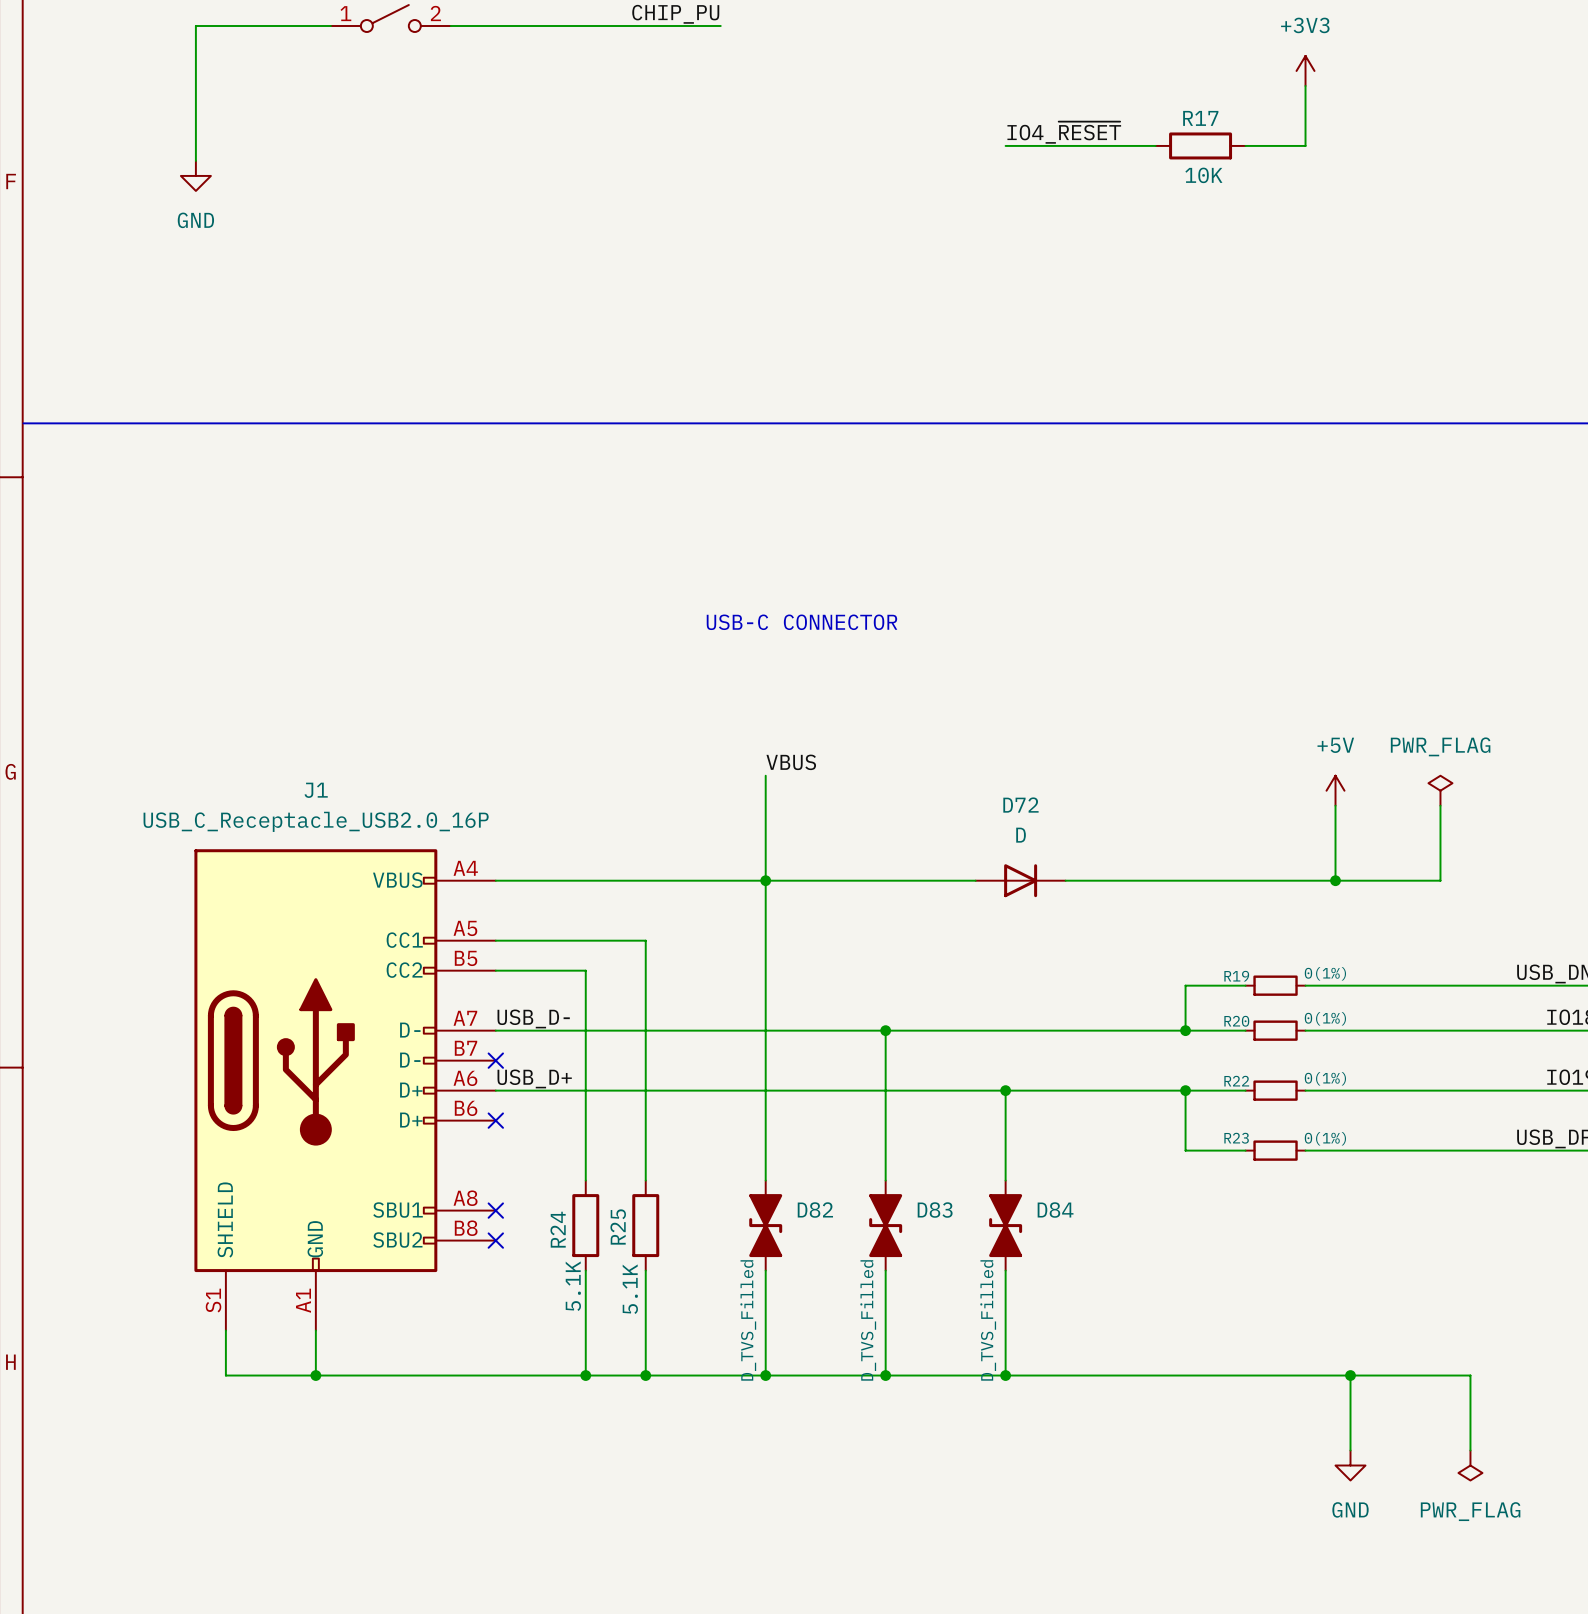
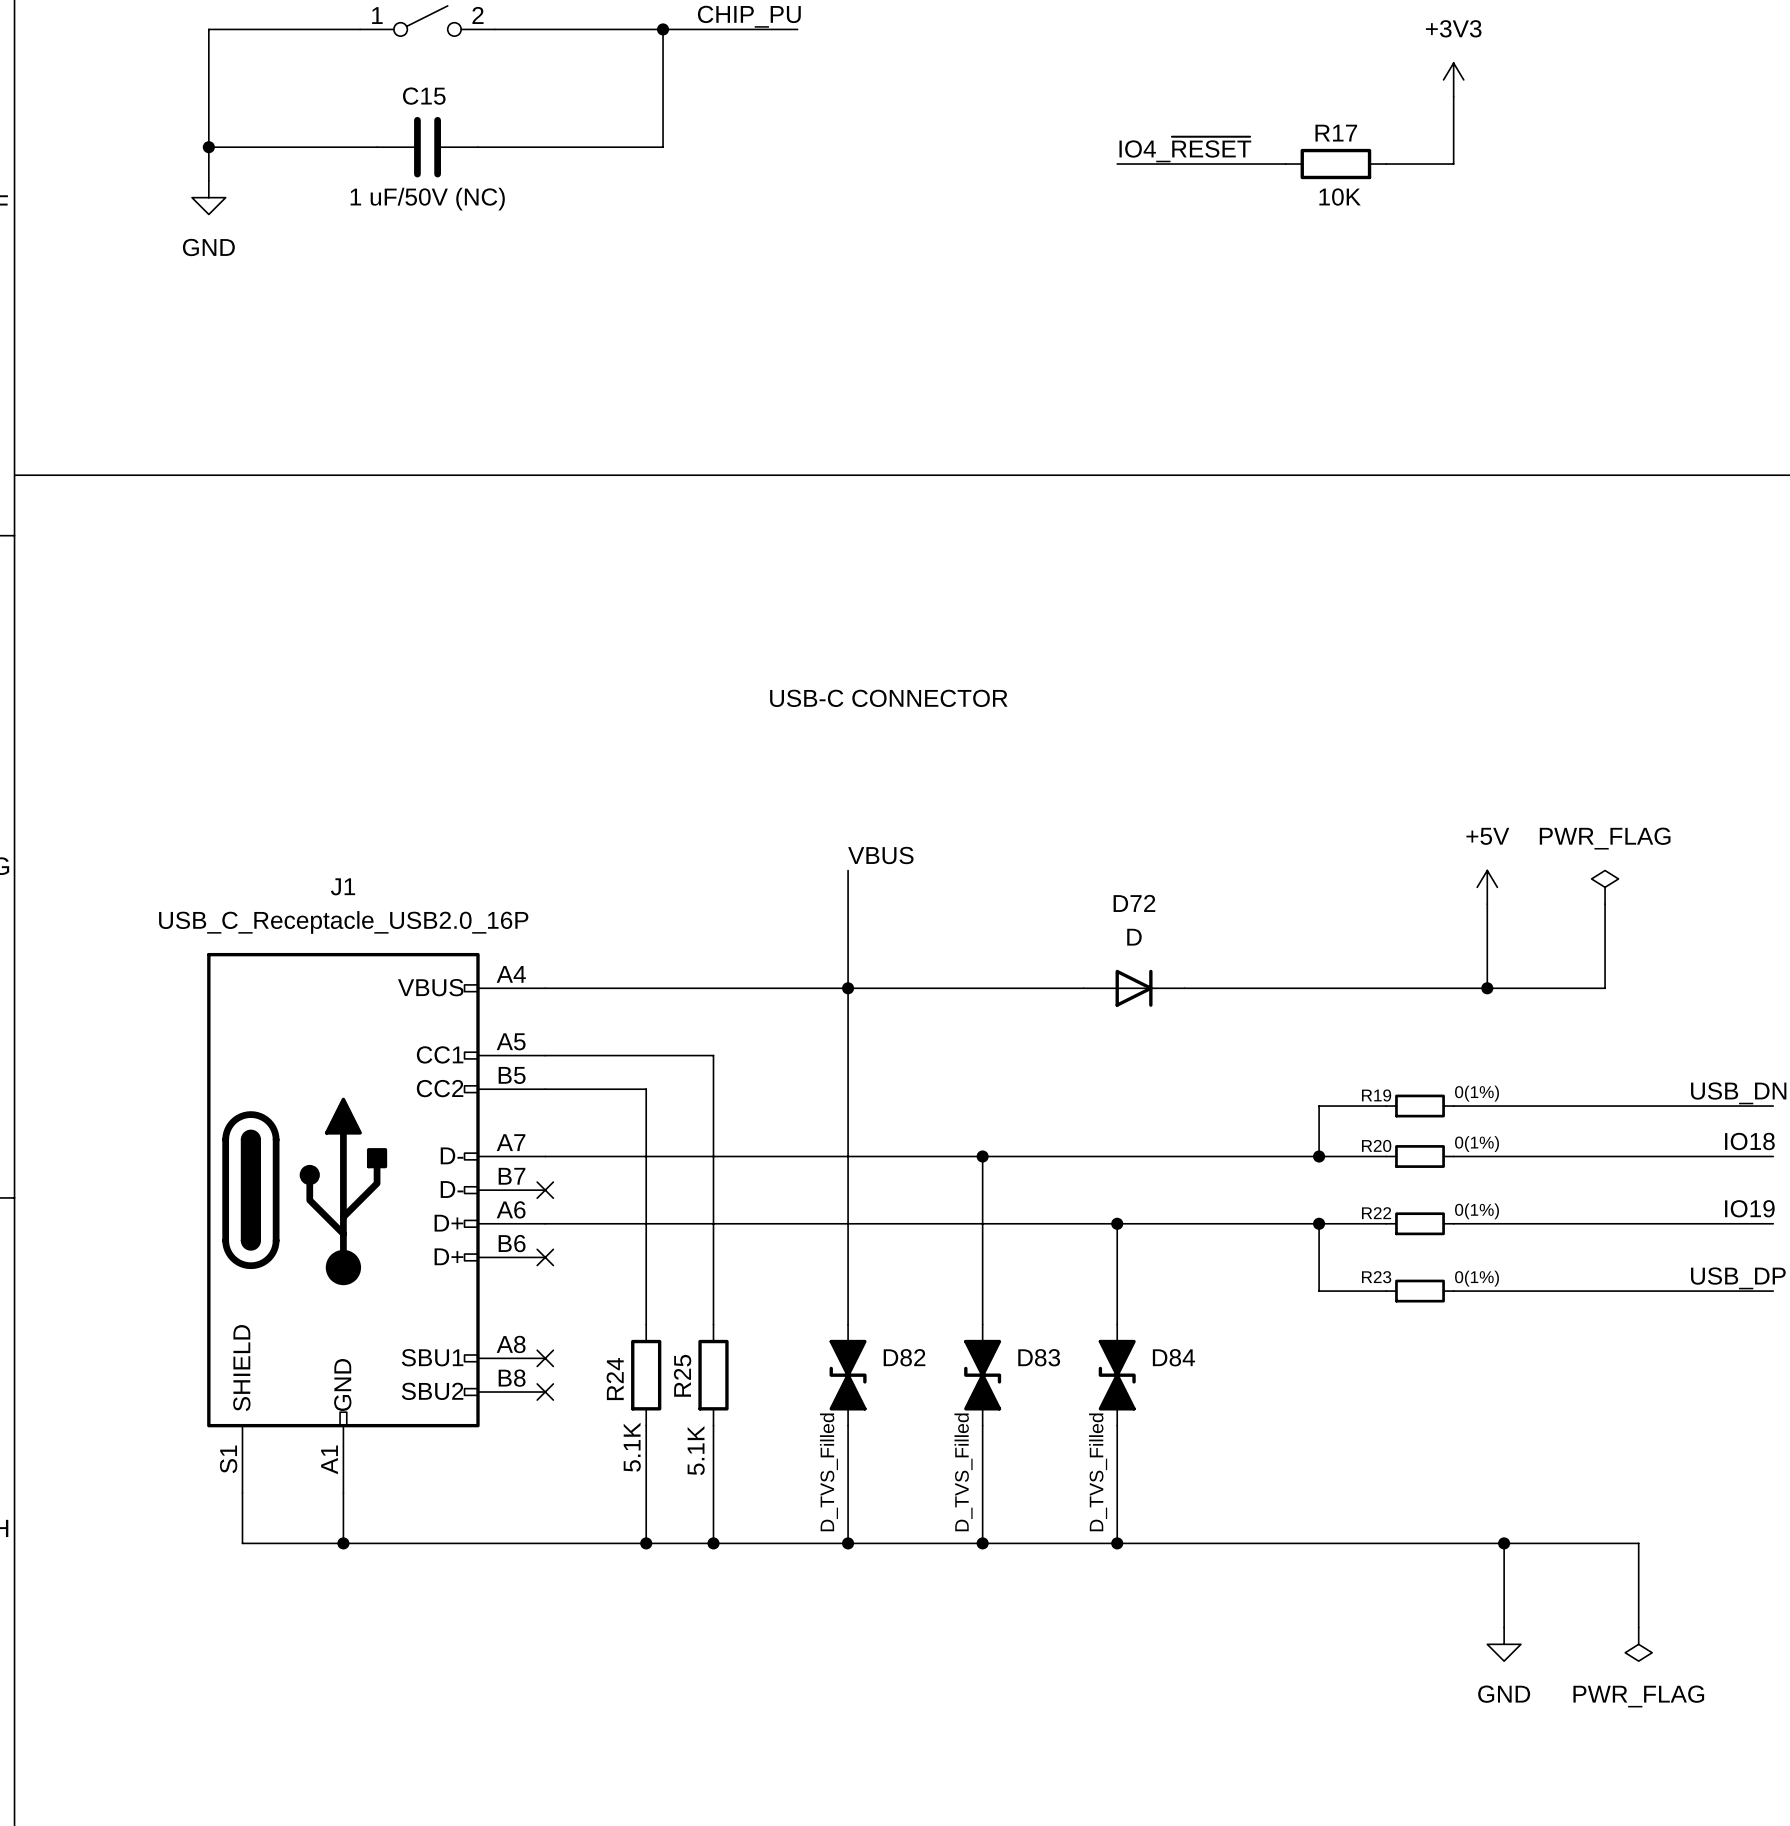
wire: none -> (663, 29) (663, 147) (477, 147)
junction: none -> (663, 29)
wire: none -> (208, 147) (377, 147)
junction: none -> (208, 147)
C15: none -> 1 uF/50V (NC) (427, 147)
label: USB_D- (533, 1018) -> none
label: USB_D+ (534, 1078) -> none

